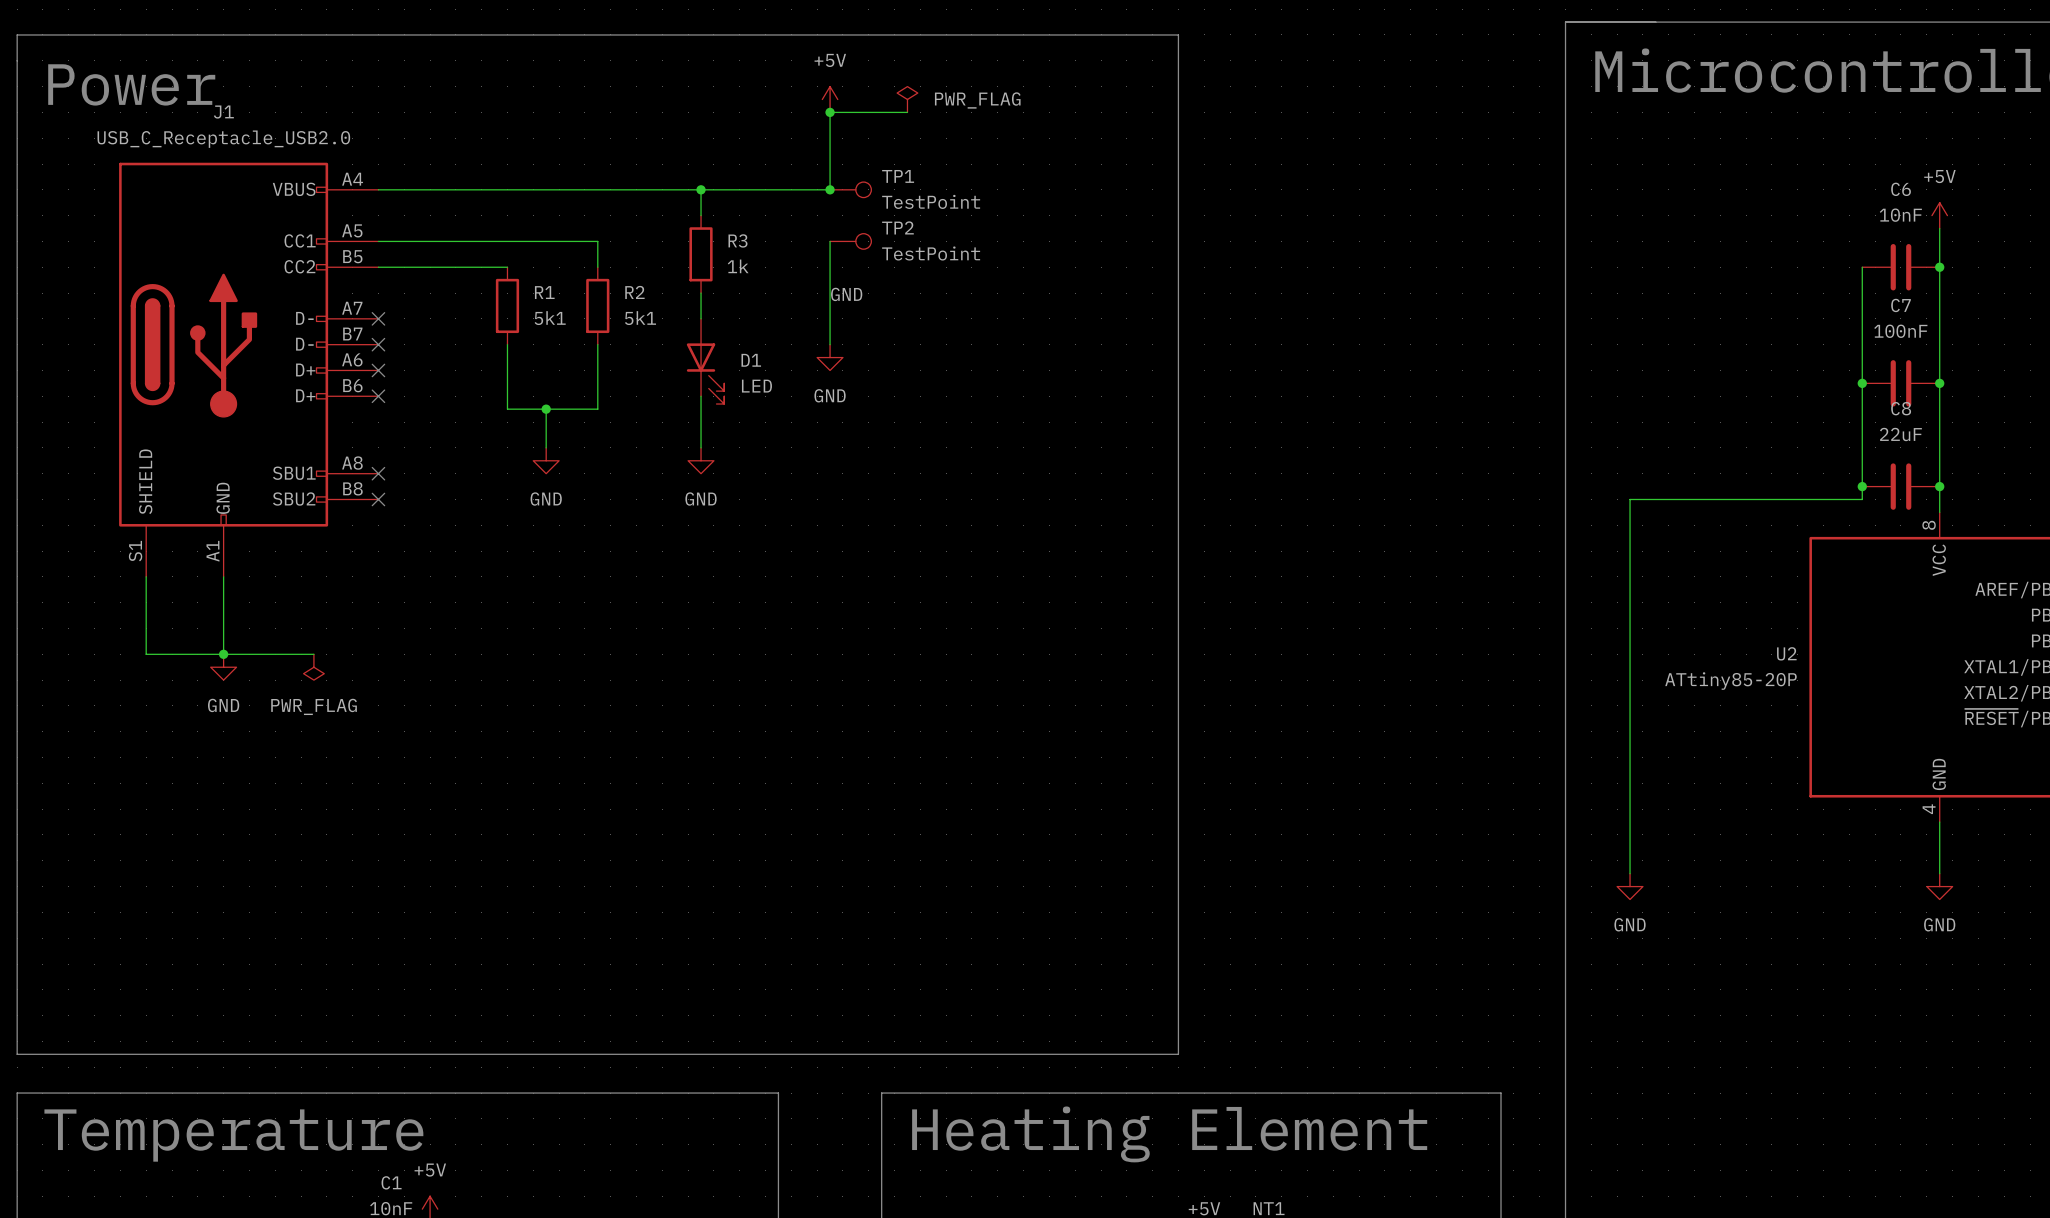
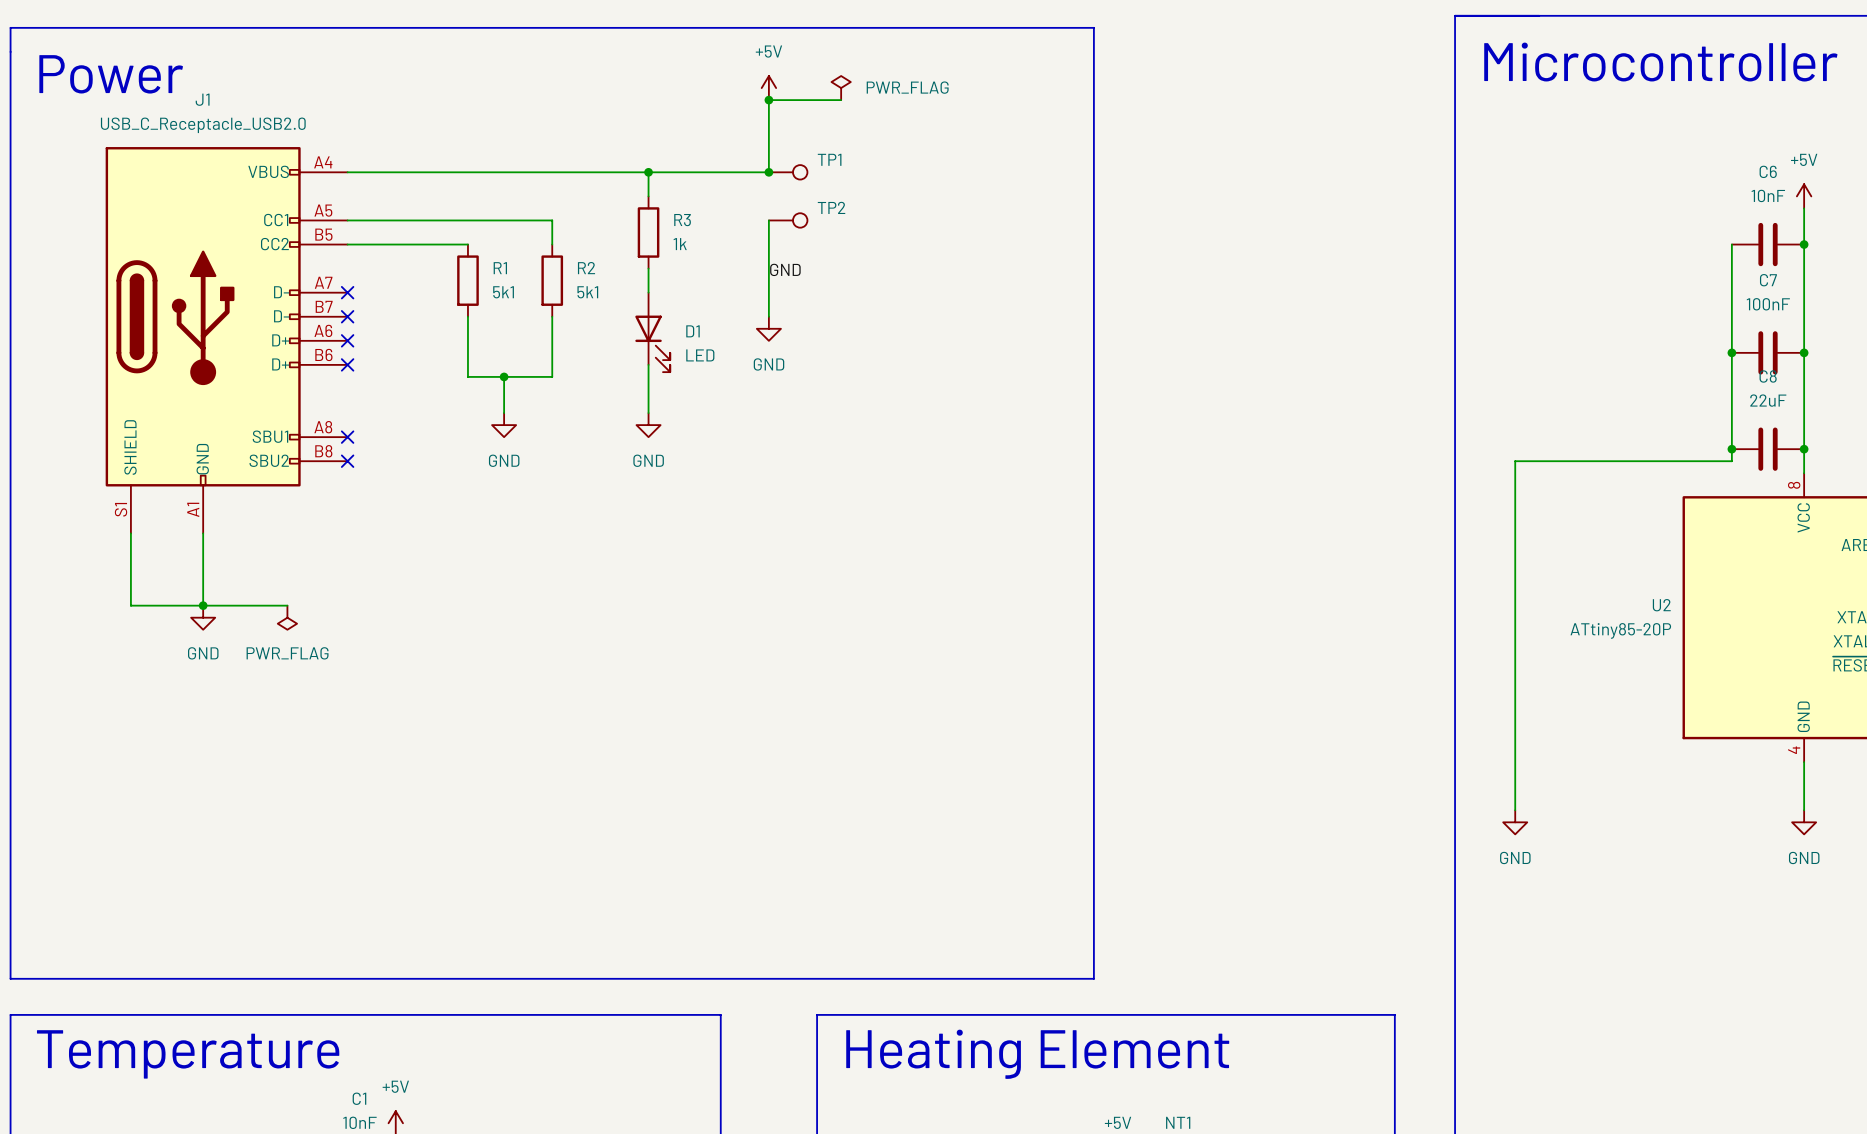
TP1 value: TestPoint (931, 201) -> none
TP2 value: TestPoint (931, 253) -> none

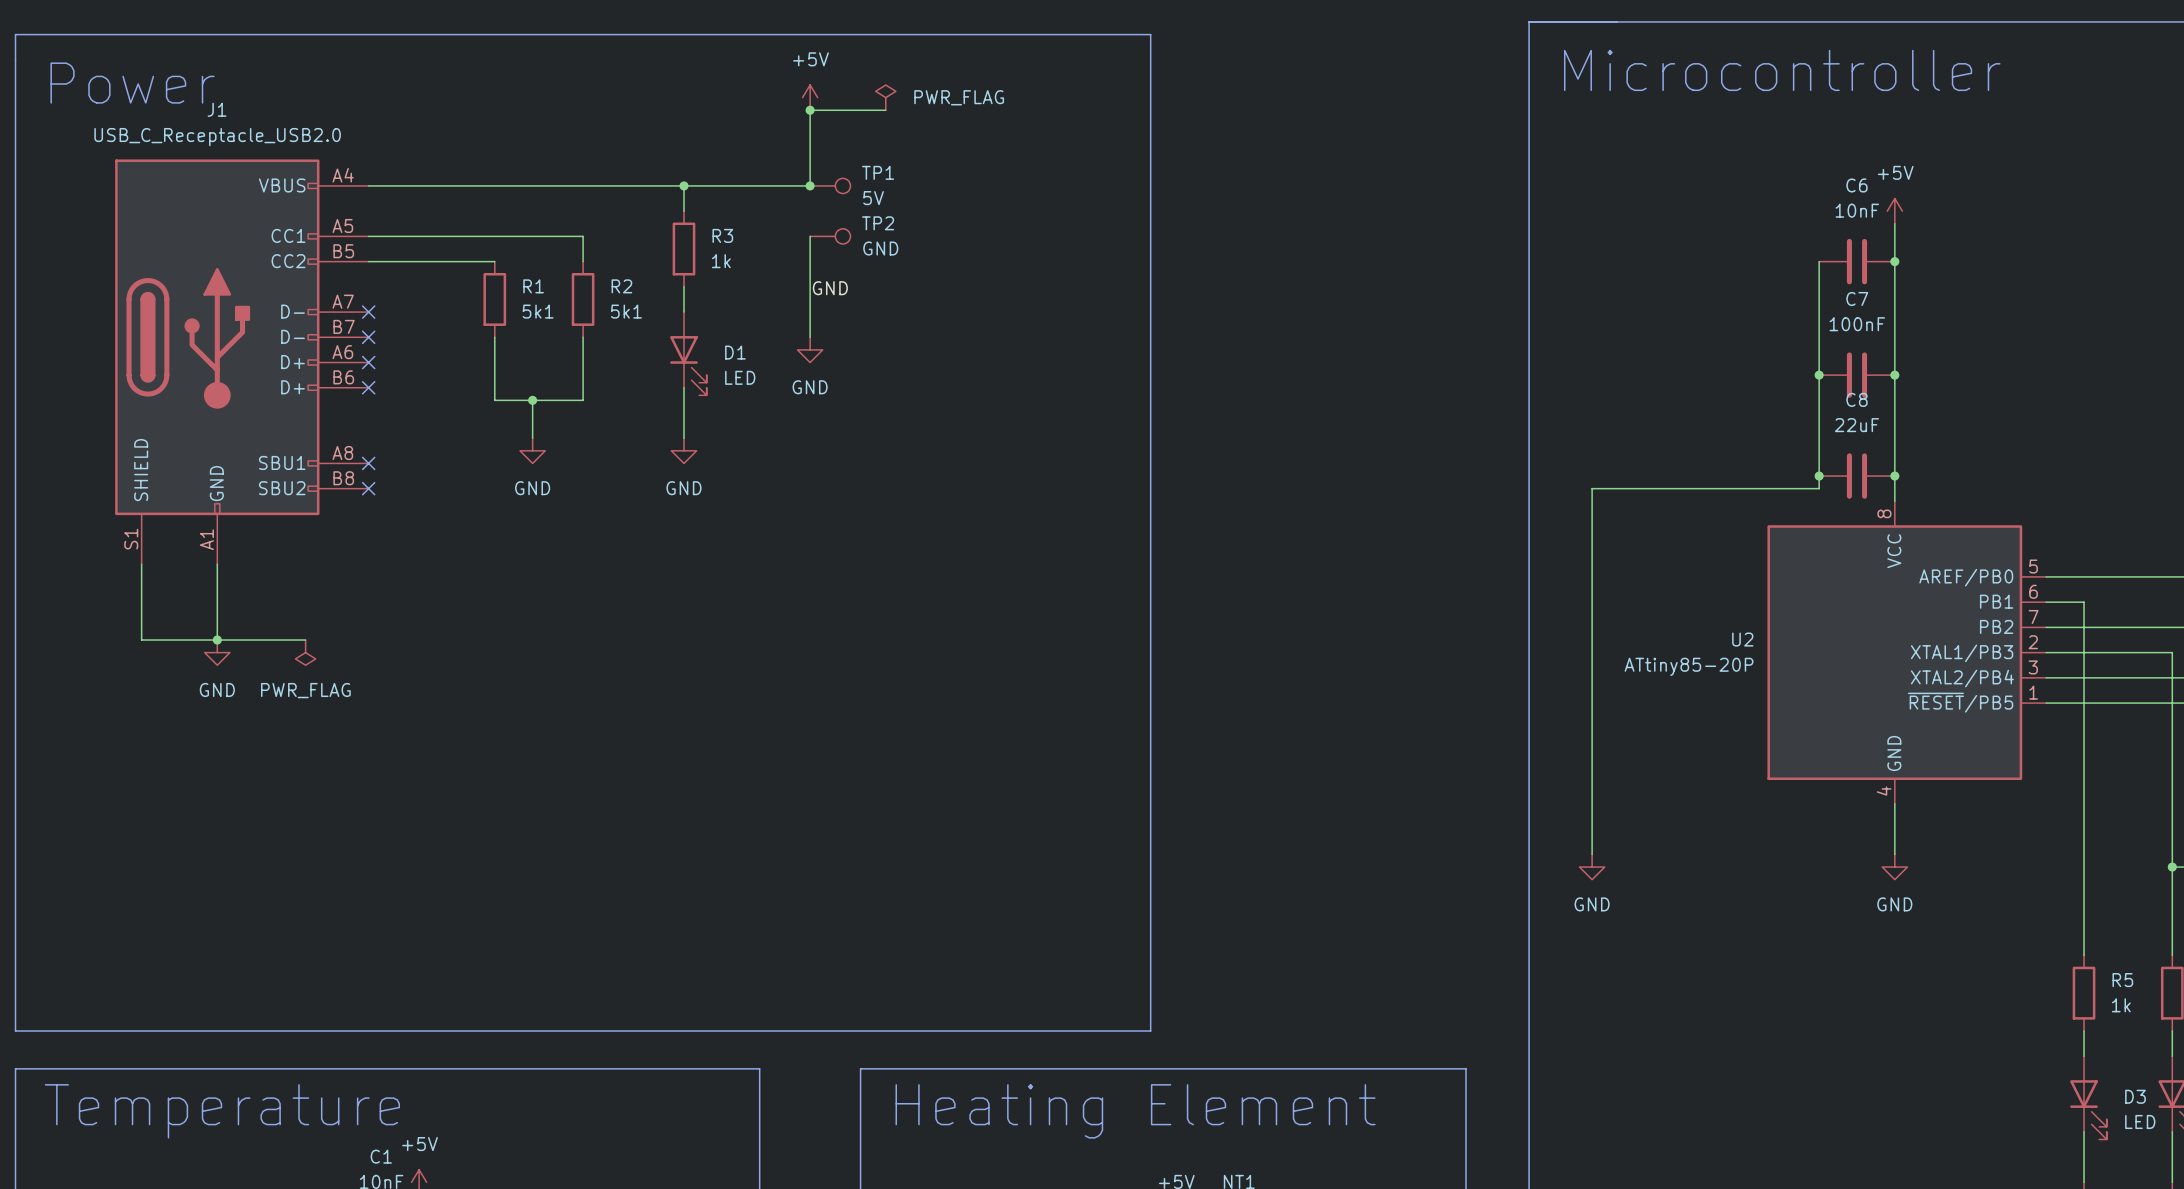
TP1 value: none -> 5V (873, 198)
TP2 value: none -> GND (880, 248)

